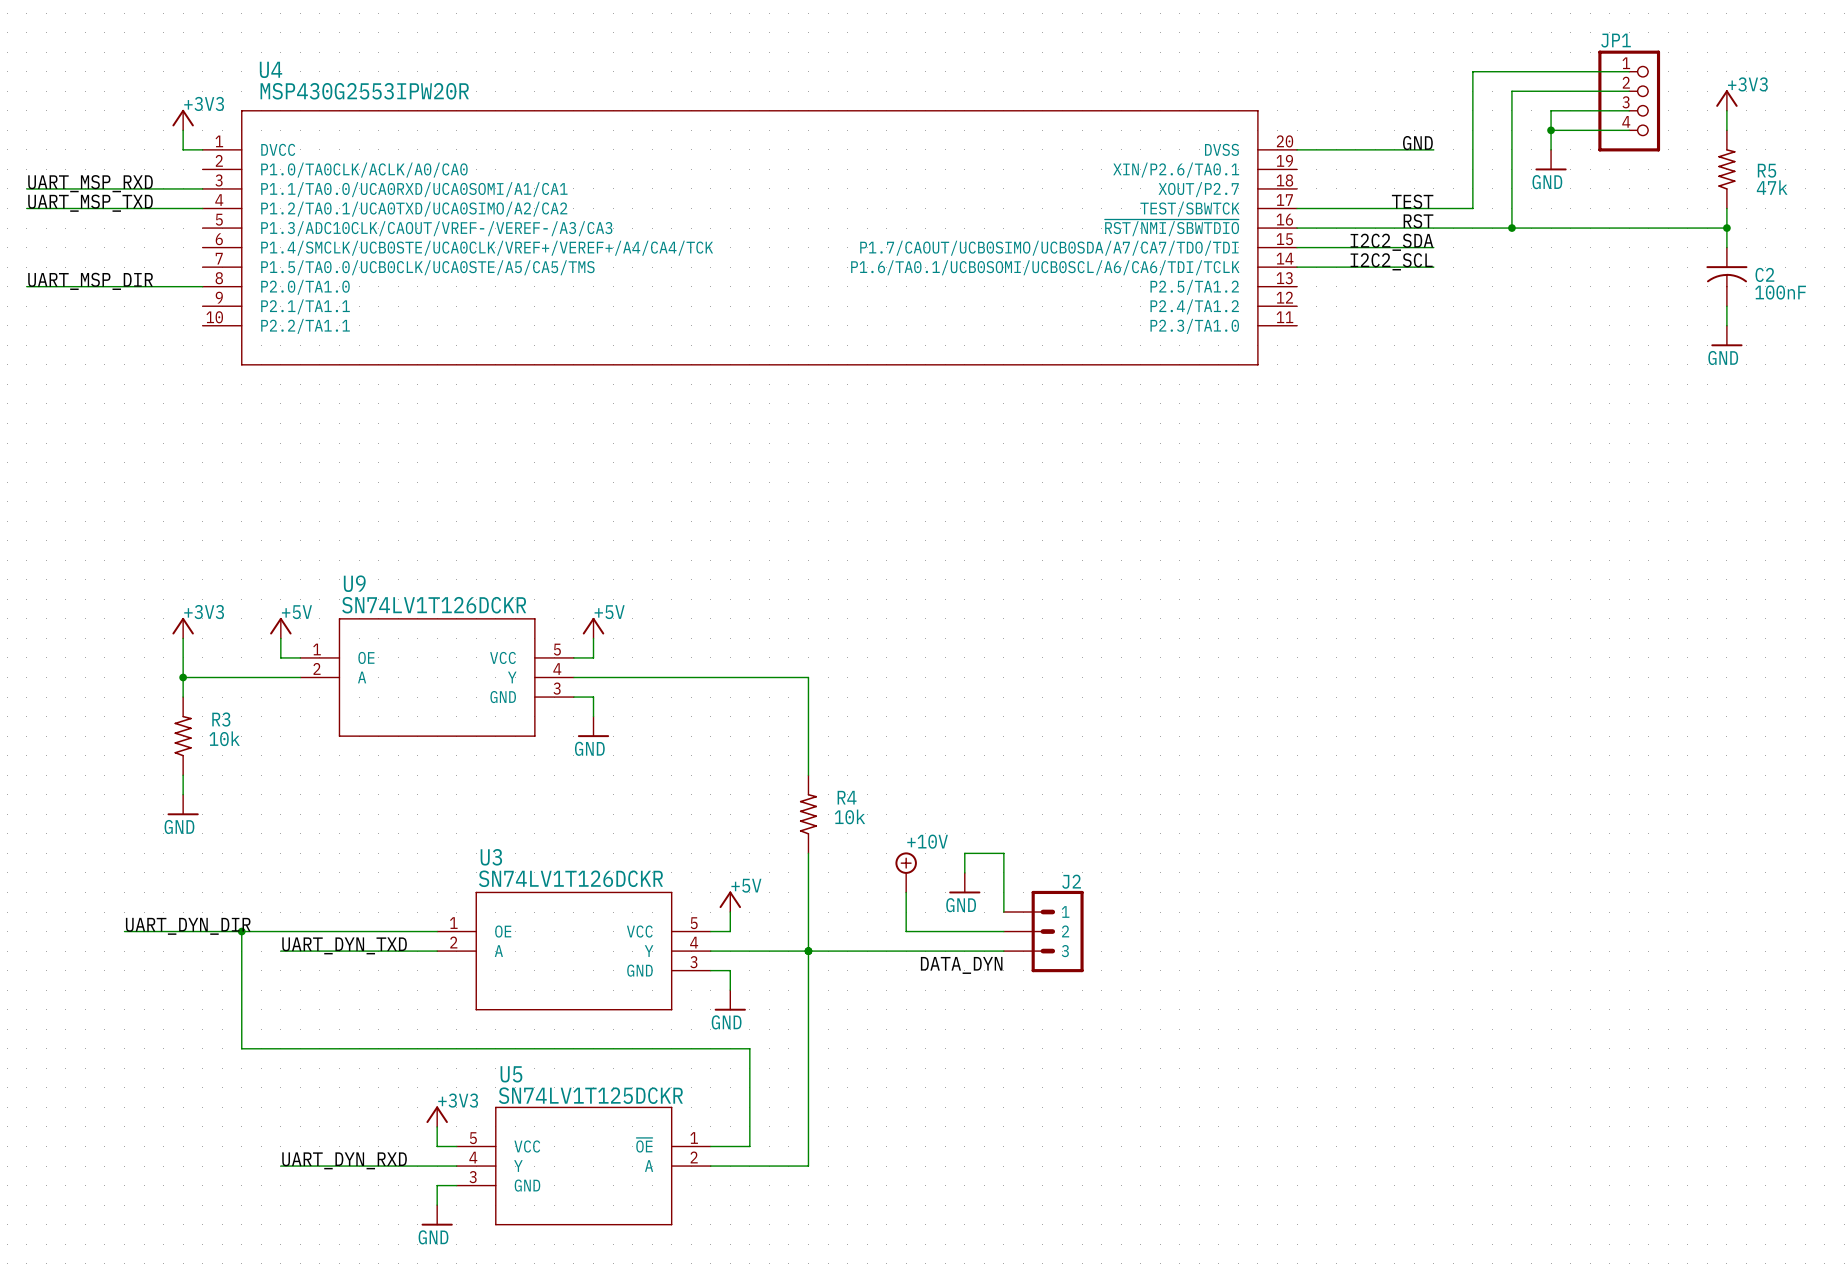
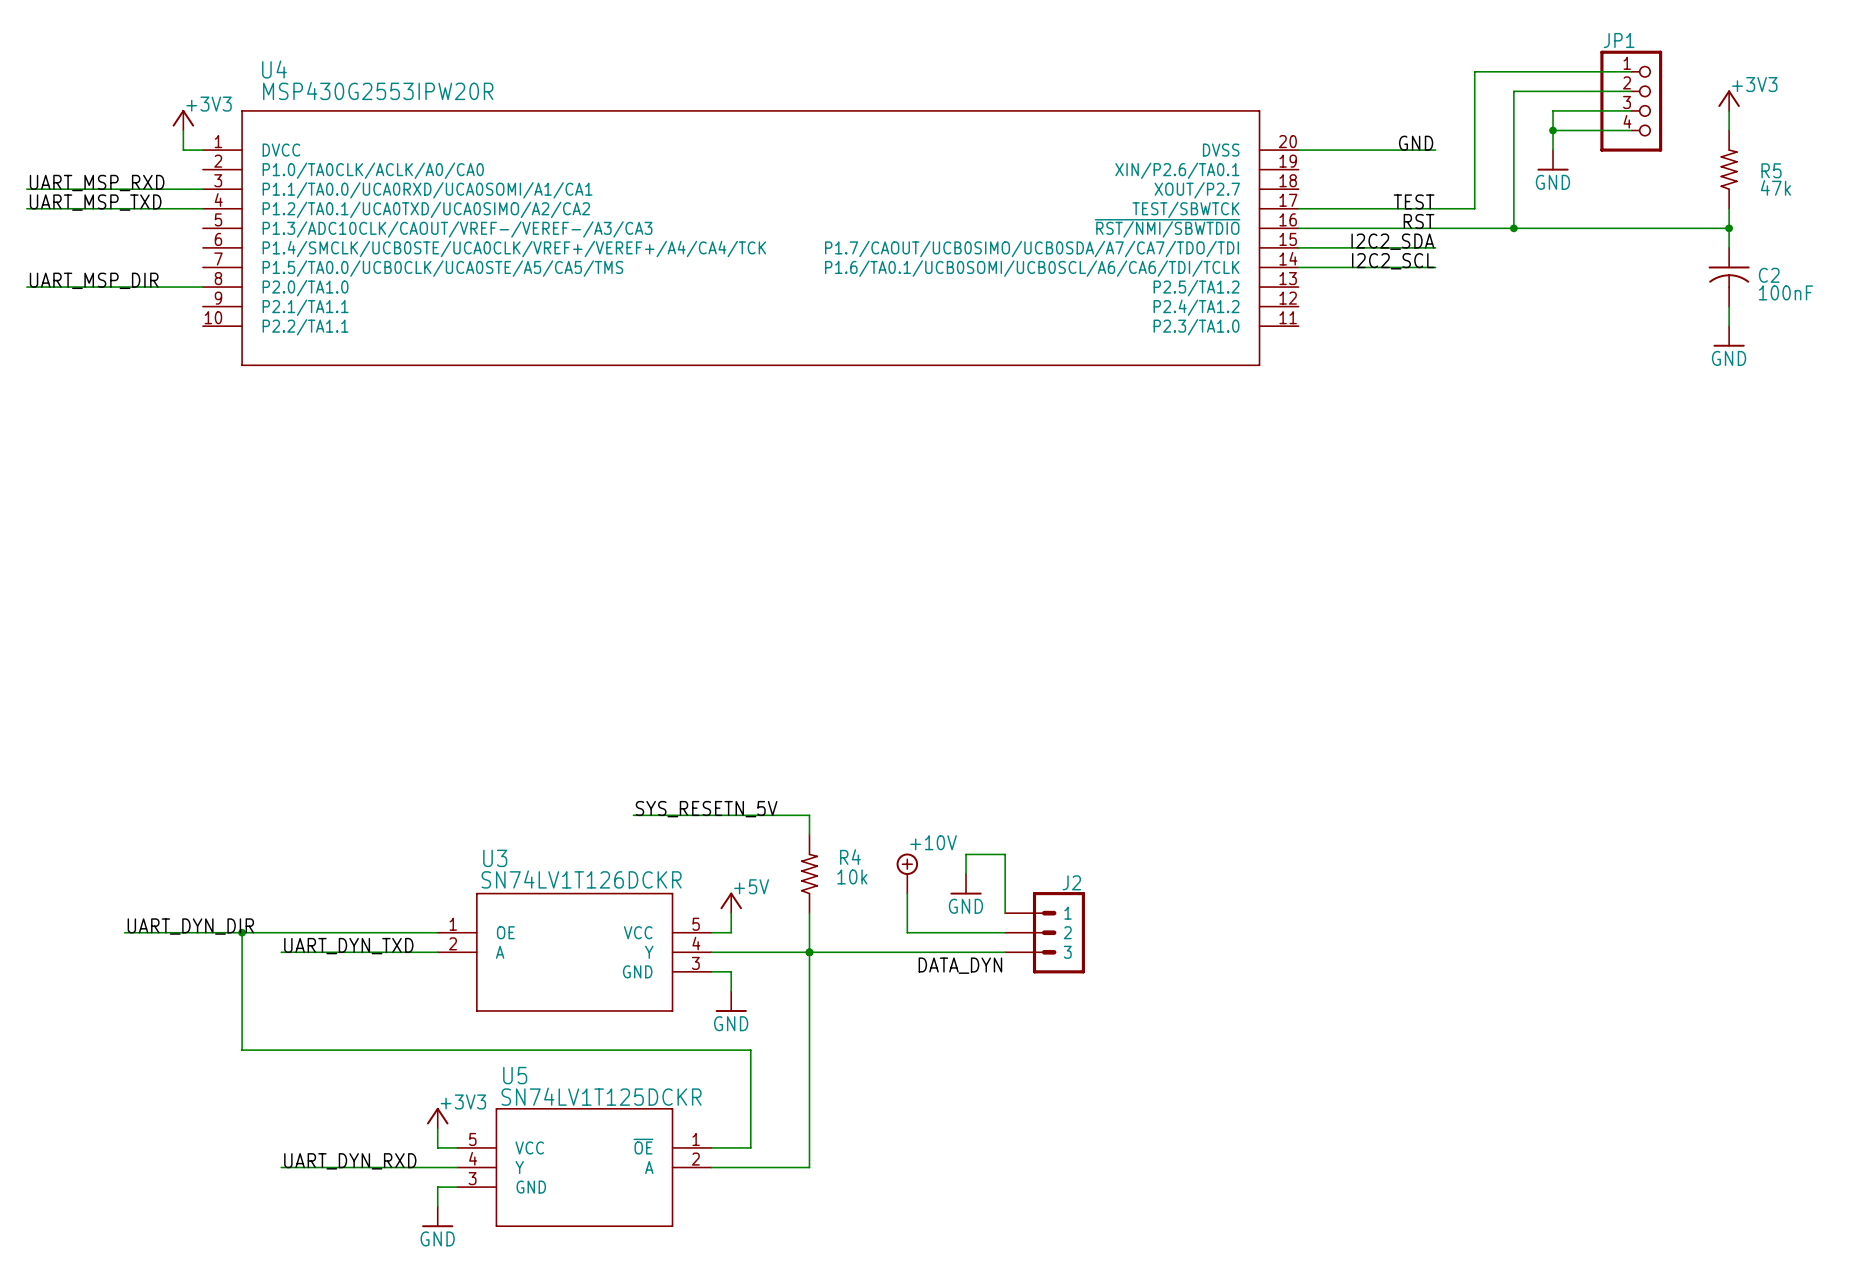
power symbol: +3V3 (183, 628) -> none
power symbol: +5V (280, 628) -> none
power symbol: +5V (593, 628) -> none
wire: (183, 638) (183, 697) -> none
wire: (280, 638) (280, 657) (300, 657) -> none
wire: (593, 638) (593, 657) (573, 657) -> none
wire: (183, 677) (300, 677) -> none
junction: (183, 677) -> none
U9: SN74LV1T126DCKR (437, 677) -> none
wire: (573, 677) (808, 677) (808, 775) -> none
wire: (573, 697) (593, 697) (593, 716) -> none
power symbol: GND (593, 726) -> none
R3: 10k (183, 736) -> none
wire: (183, 775) (183, 794) -> none
power symbol: GND (183, 805) -> none
label: none -> SYS_RESETN_5V (706, 809)
wire: none -> (633, 815) (809, 815) (809, 834)
R4 position: (808, 814) -> (809, 874)

